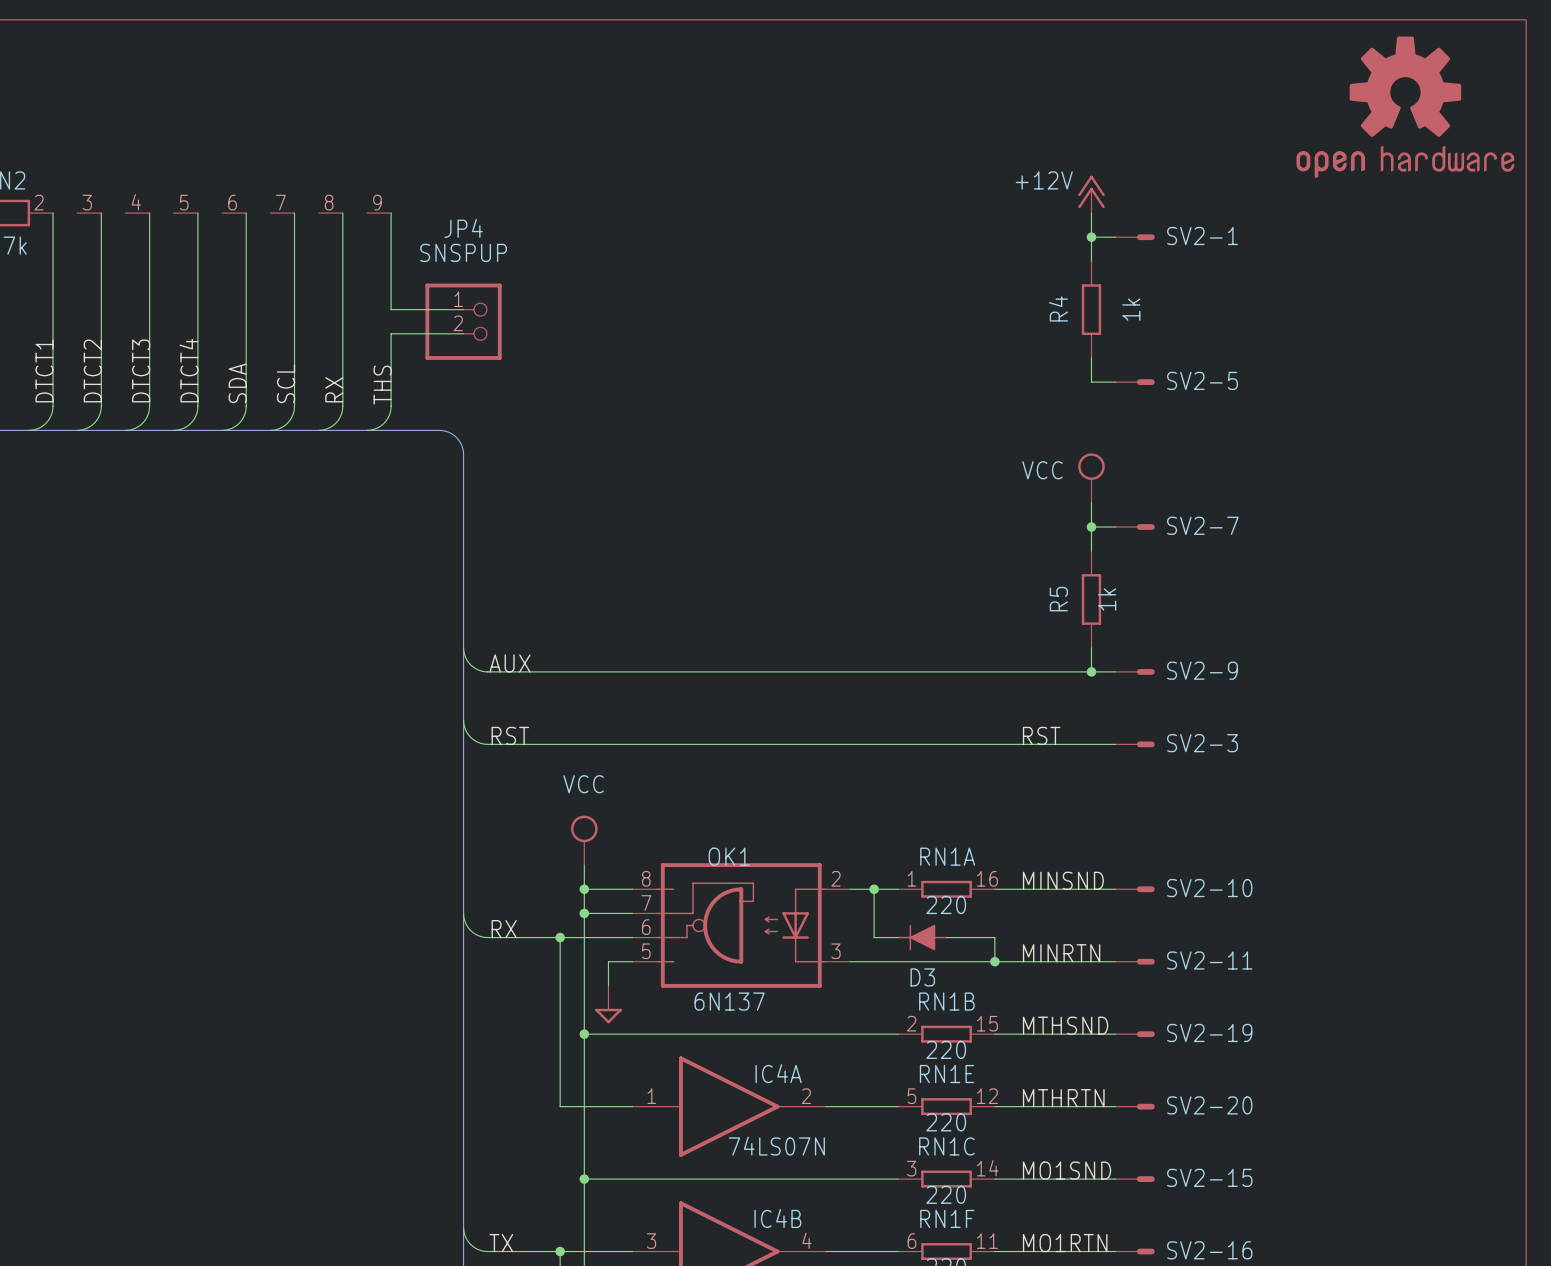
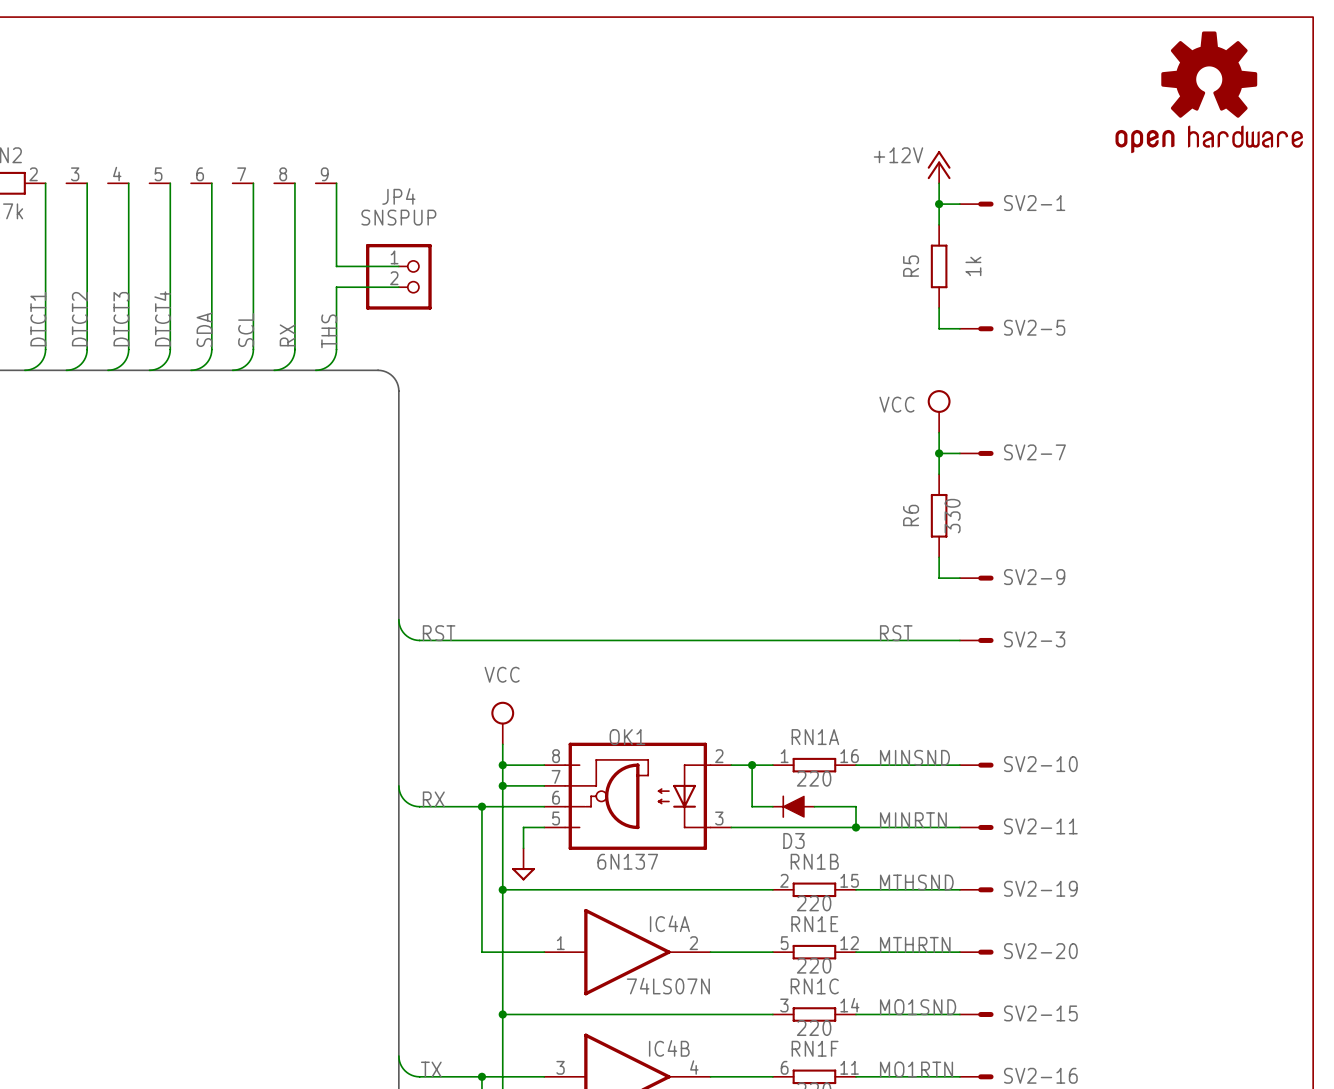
R4 name: R4 (1058, 308) -> R5 (911, 266)
R5 name: R5 (1058, 599) -> R6 (911, 515)
R5 value: 1k (1107, 599) -> 330 (952, 516)
wire: (463, 647) (465, 657) (470, 664) (478, 670) (487, 671) (1091, 671) -> none
label: AUX (509, 663) -> none
junction: (1091, 671) -> none

